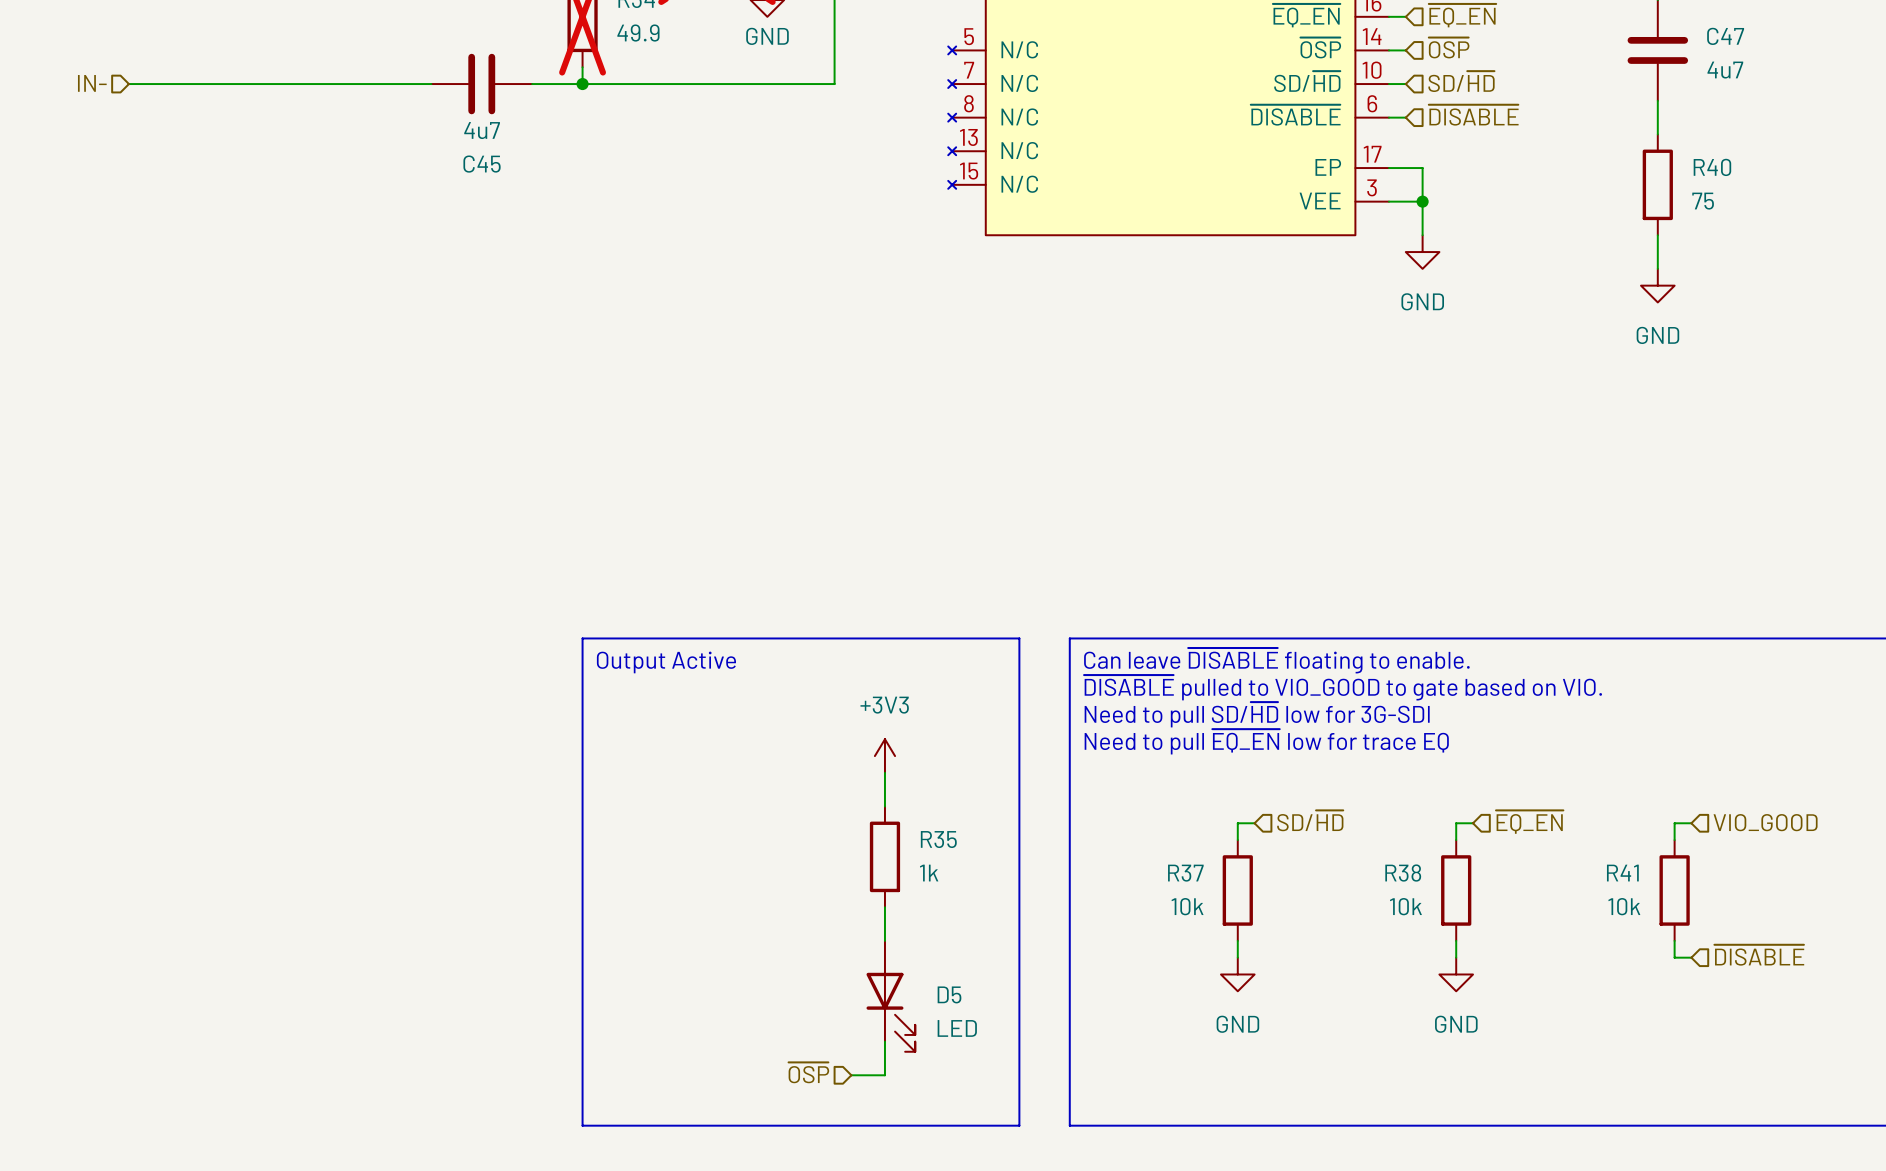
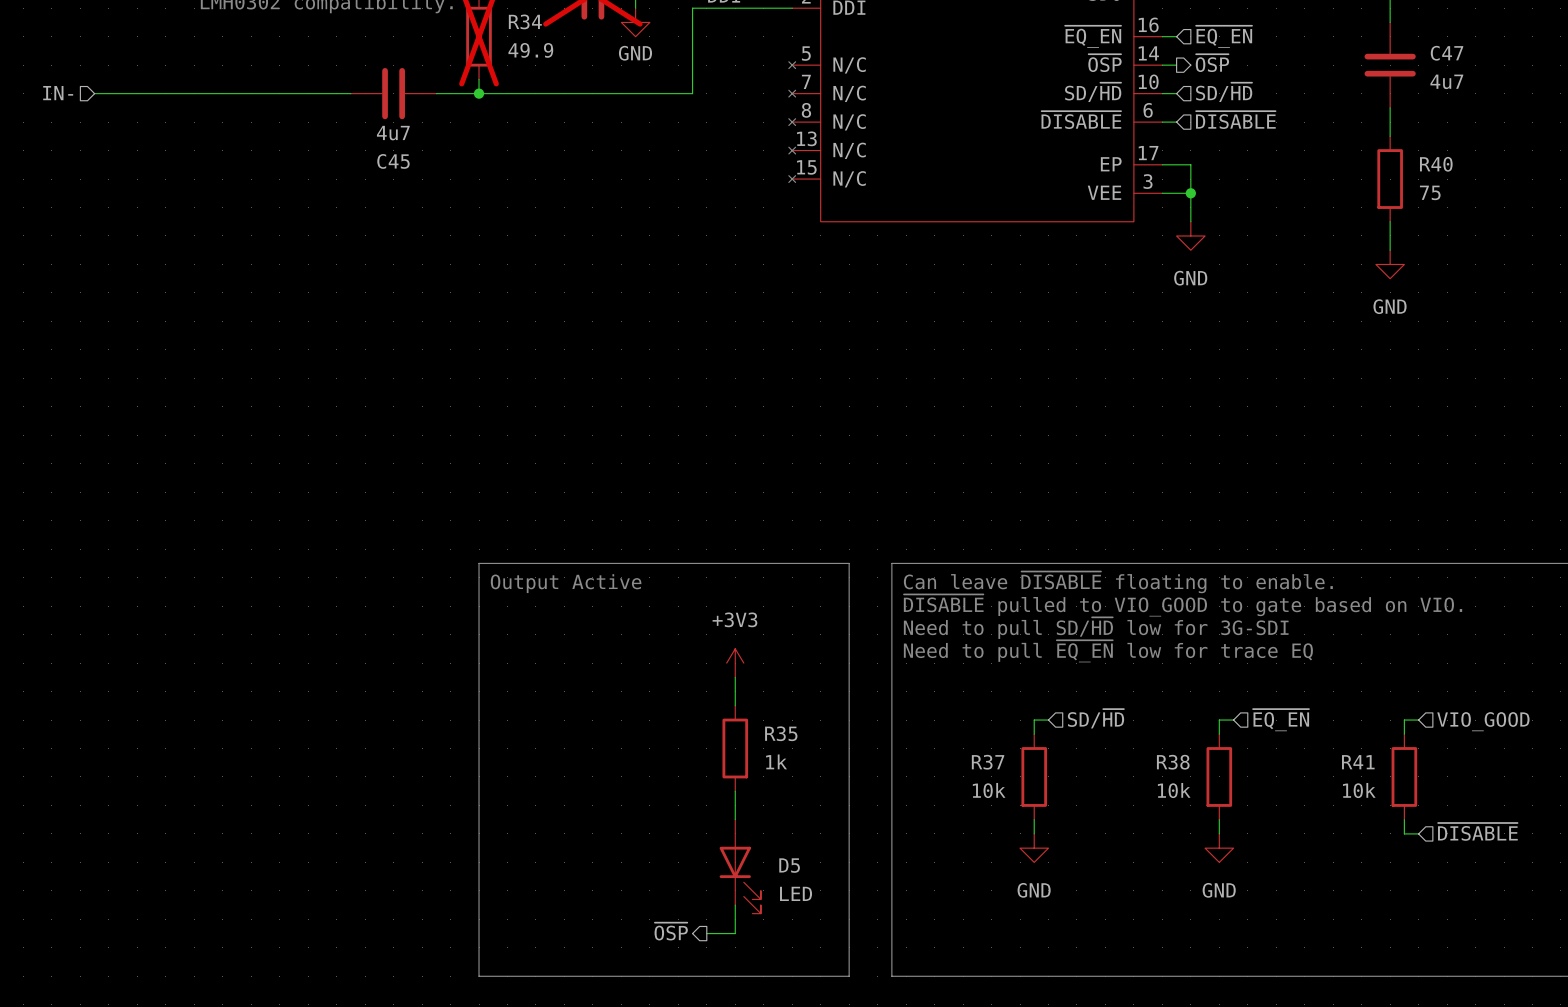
hierarchical label shape: input (1449, 47) -> output (1212, 63)
hierarchical label shape: input (808, 1072) -> output (671, 931)

